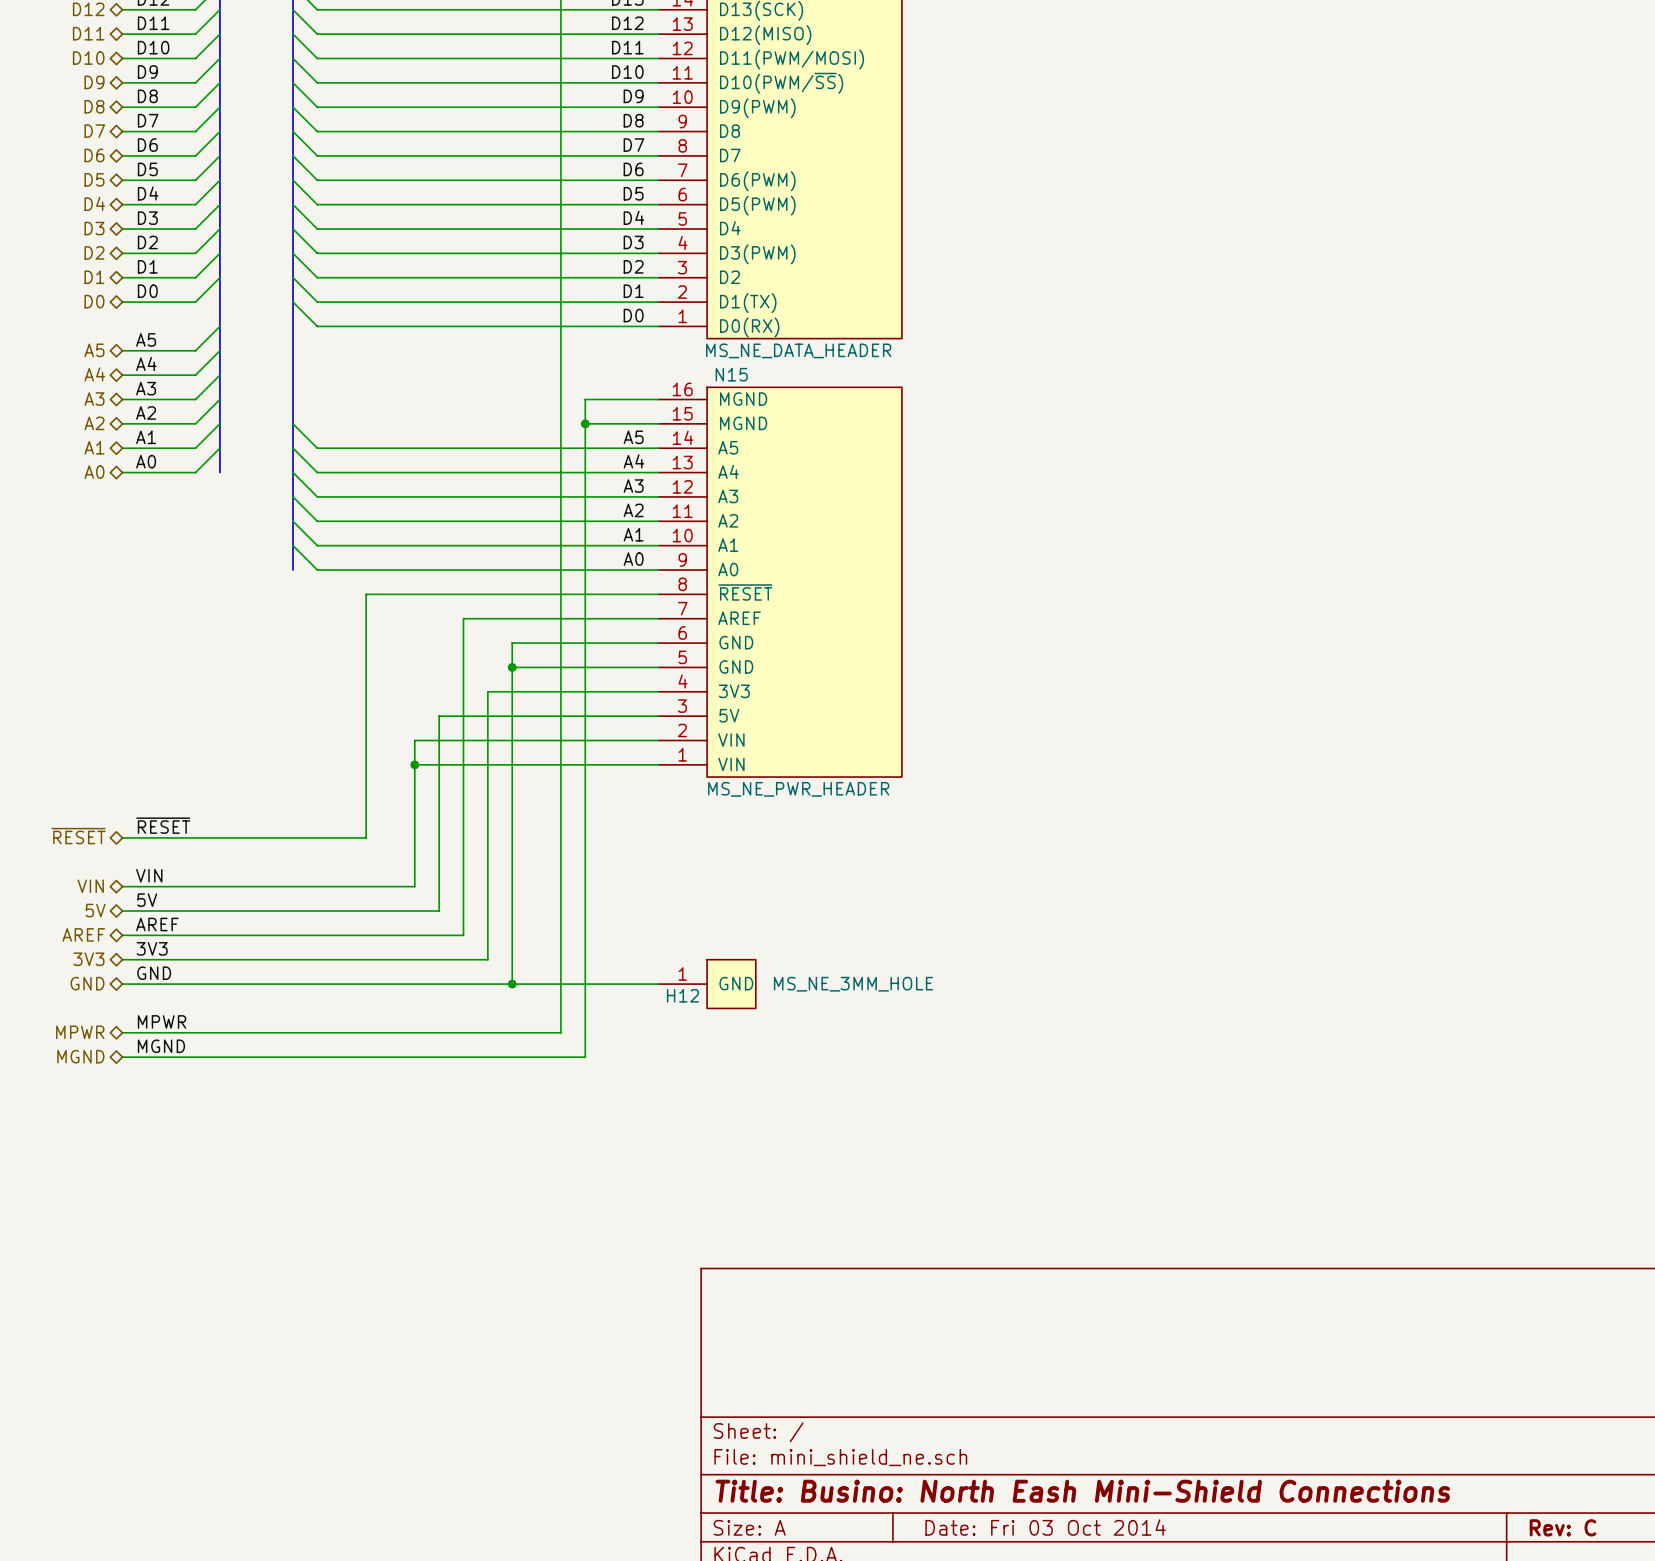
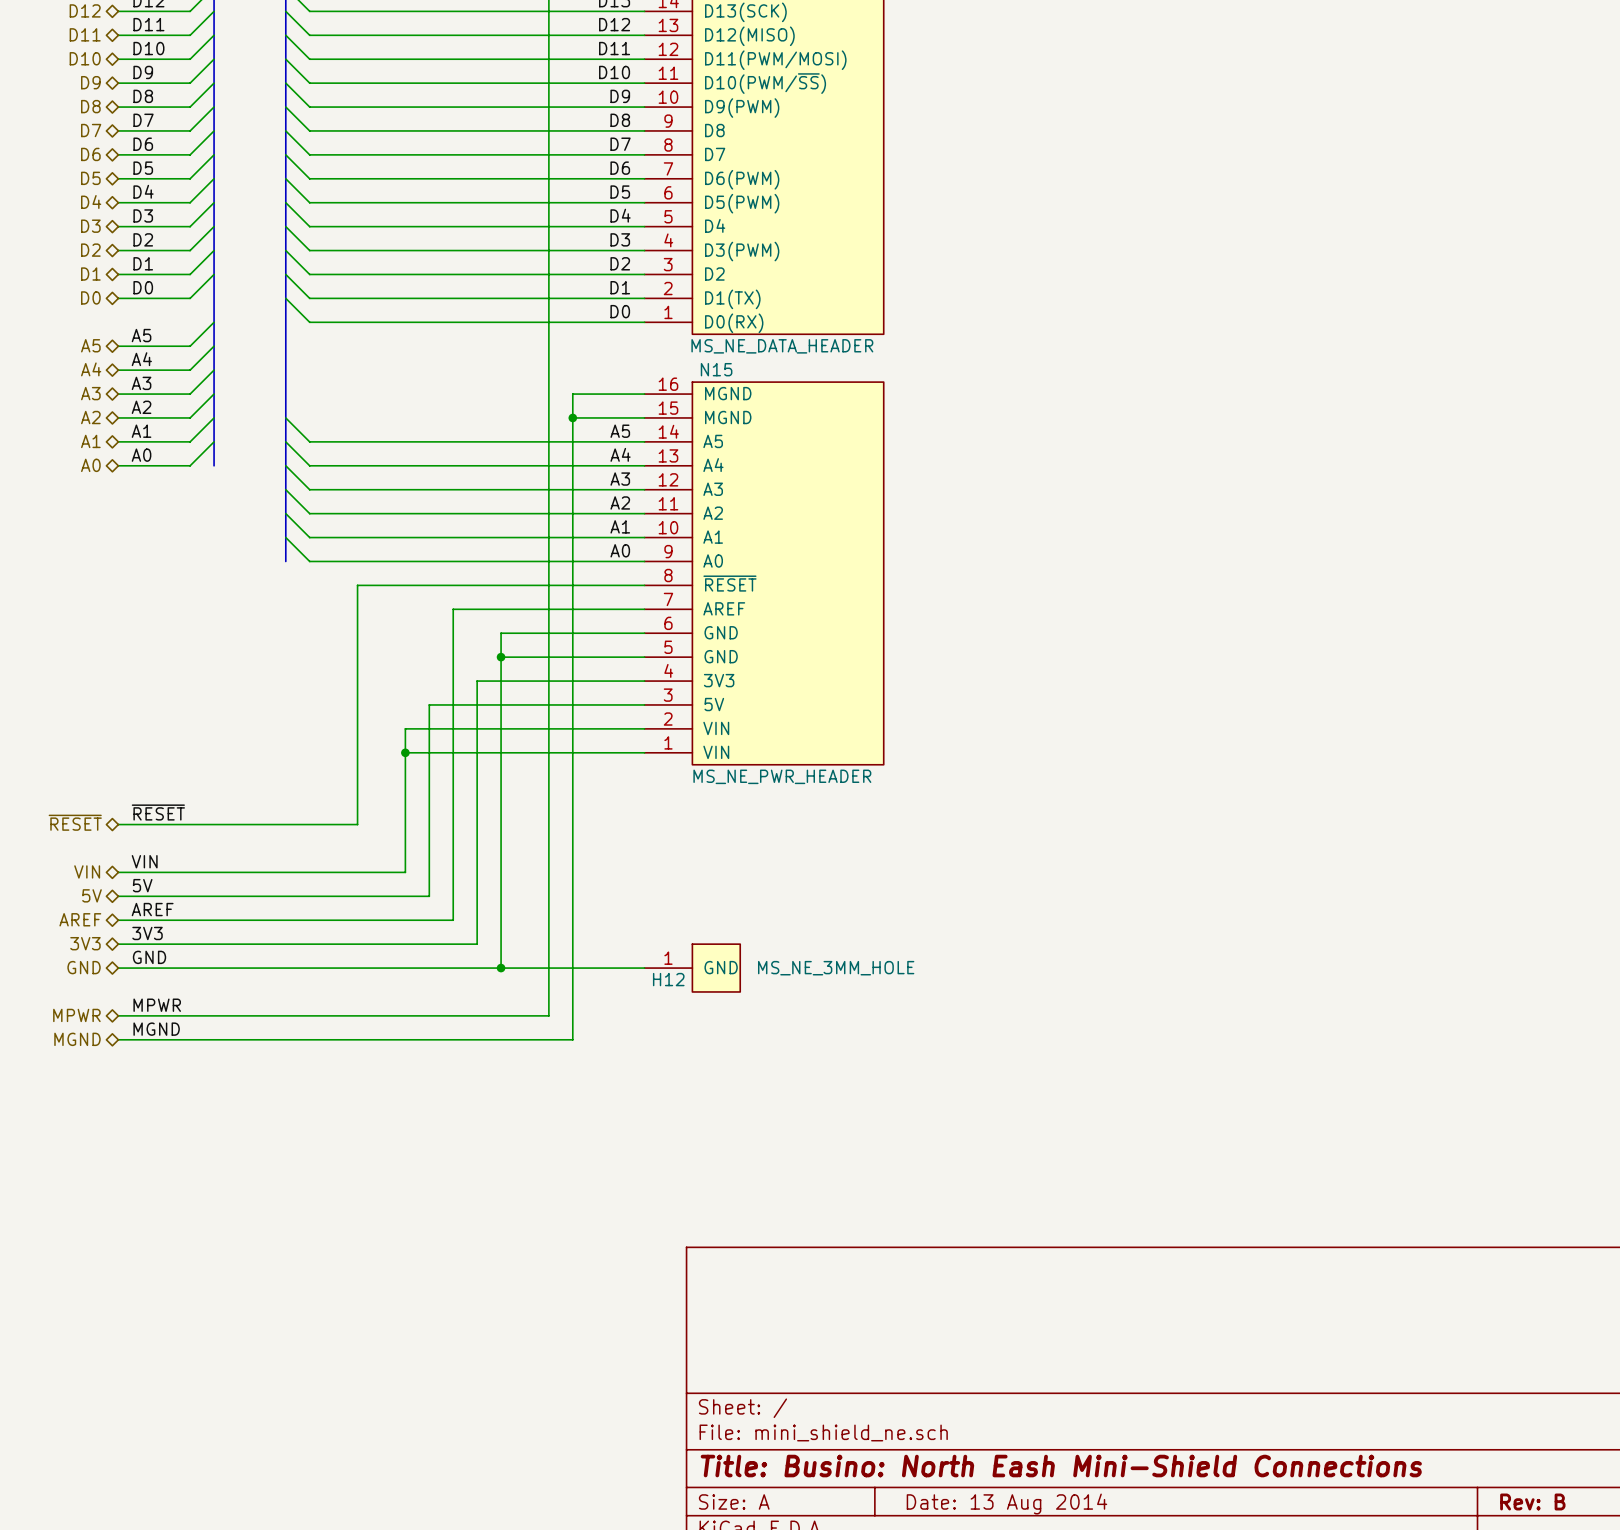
title block: Date: Fri 03 Oct 2014 (1045, 1527) -> Date: 13 Aug 2014 (1006, 1504)
title block: Rev: C (1563, 1527) -> Rev: B (1532, 1501)

